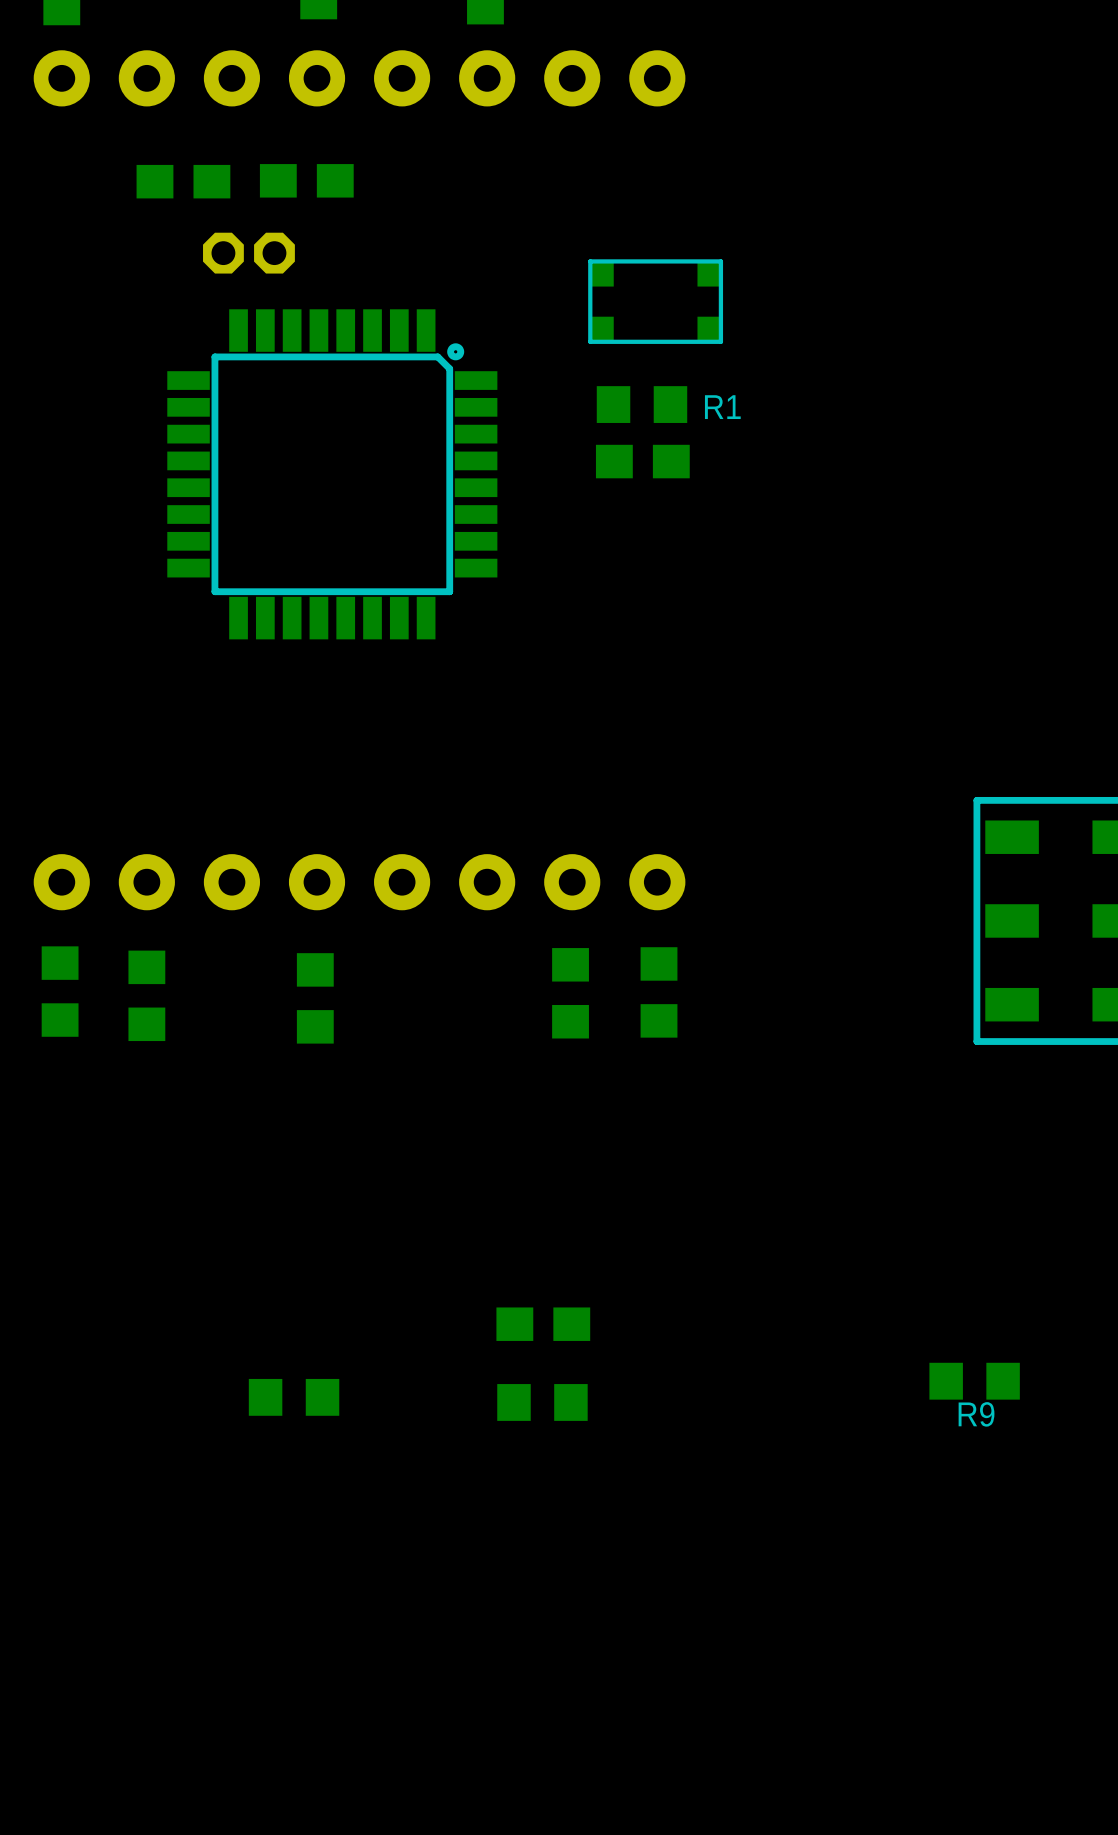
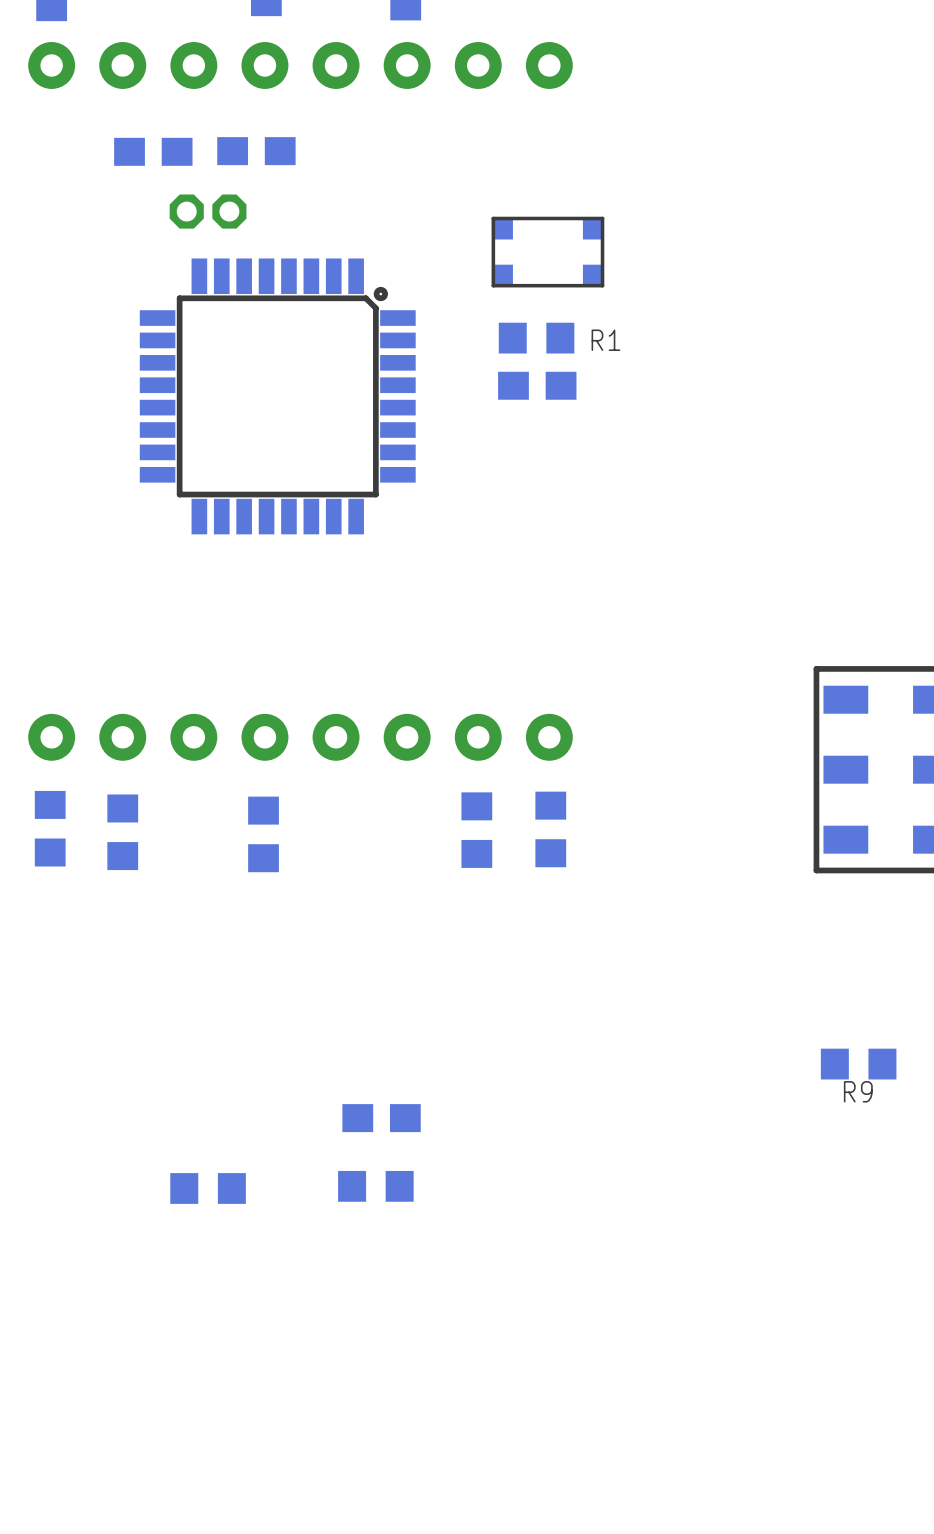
part position: (543, 1324) -> (381, 1118)
R9 position: (974, 1381) -> (858, 1064)
part position: (294, 1397) -> (208, 1188)
part: (542, 1402) -> none
part: none -> (375, 1186)

